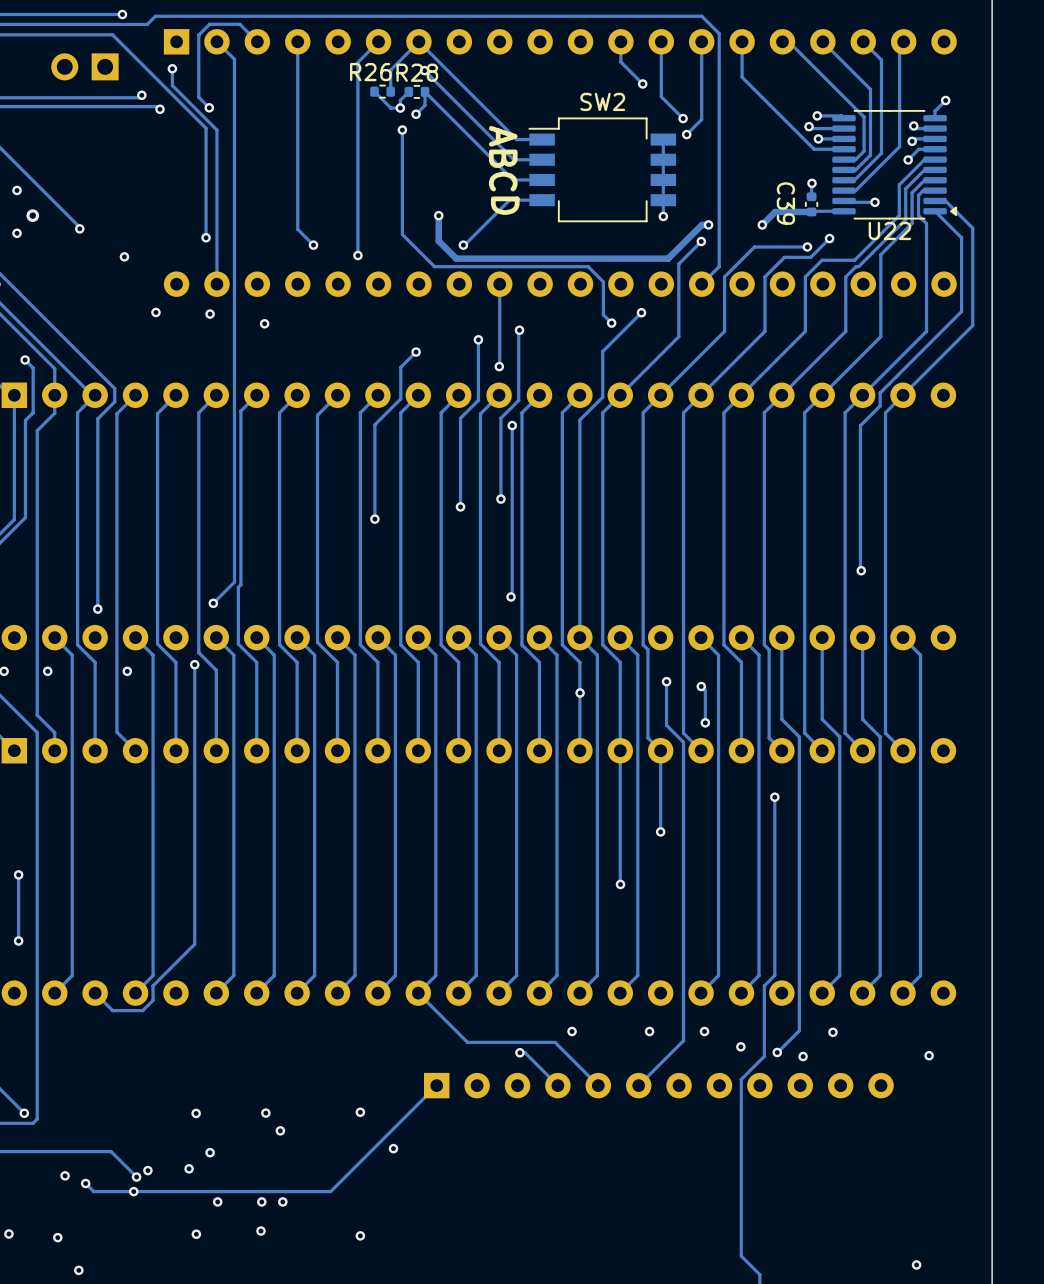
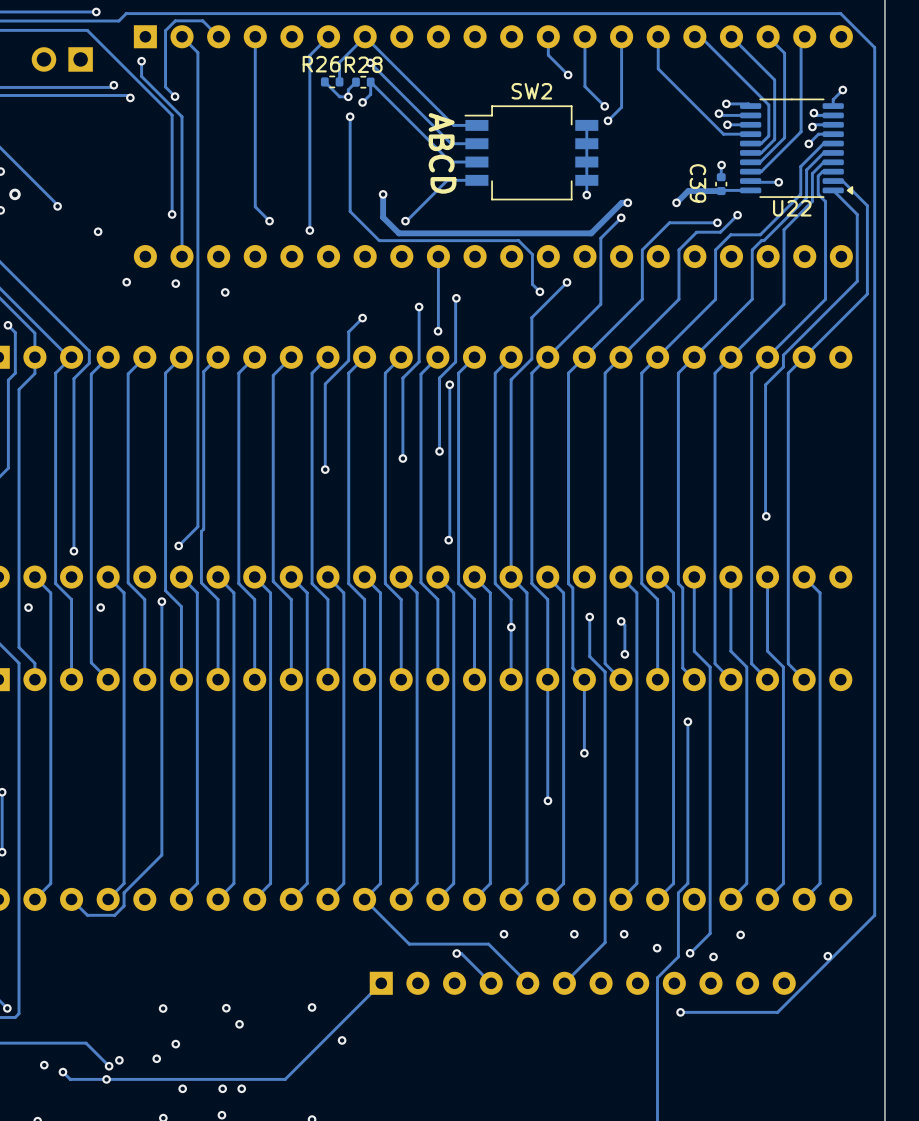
track: (701, 16) (719, 33) (719, 266) (701, 284) -> (621, 13) (840, 13) (874, 47) (874, 915) (777, 1012) (680, 1012)
via: none -> (680, 1012)

